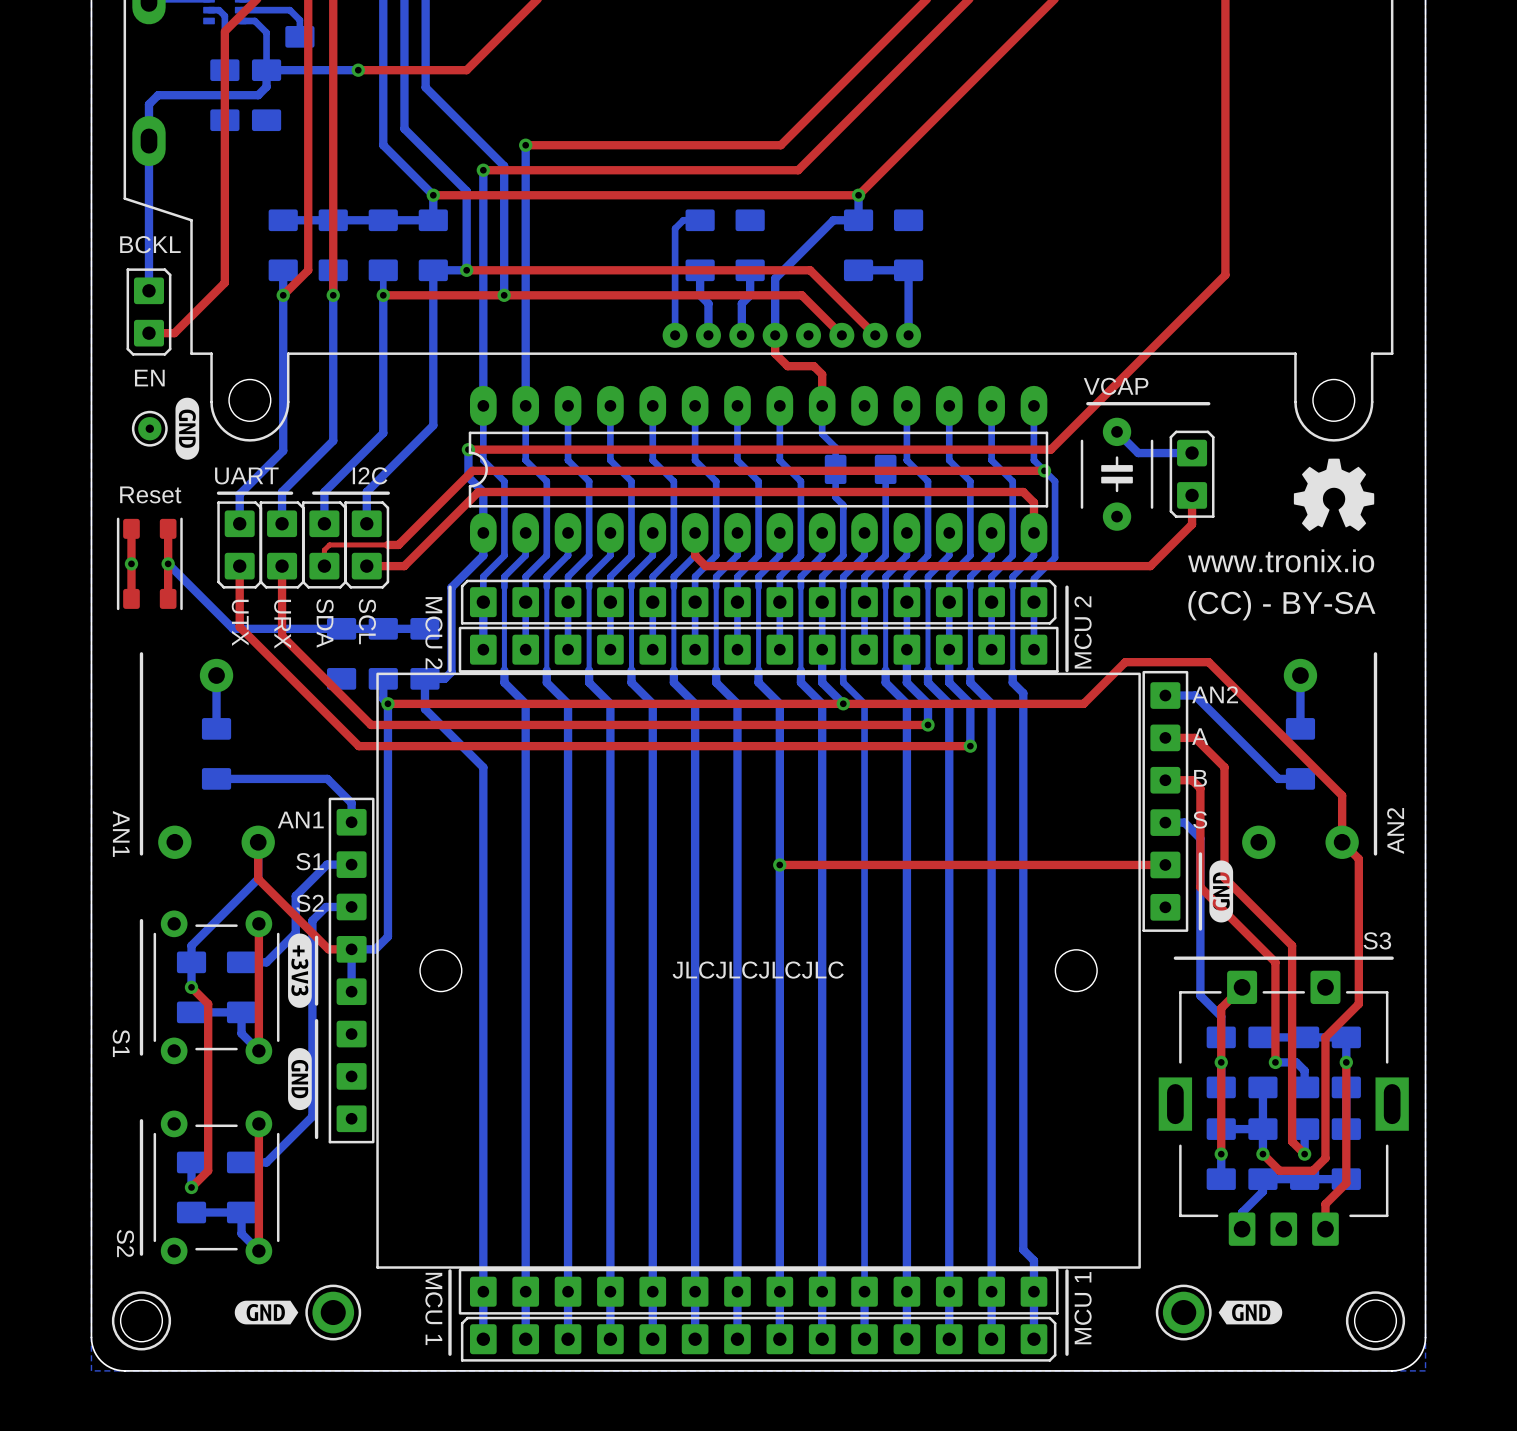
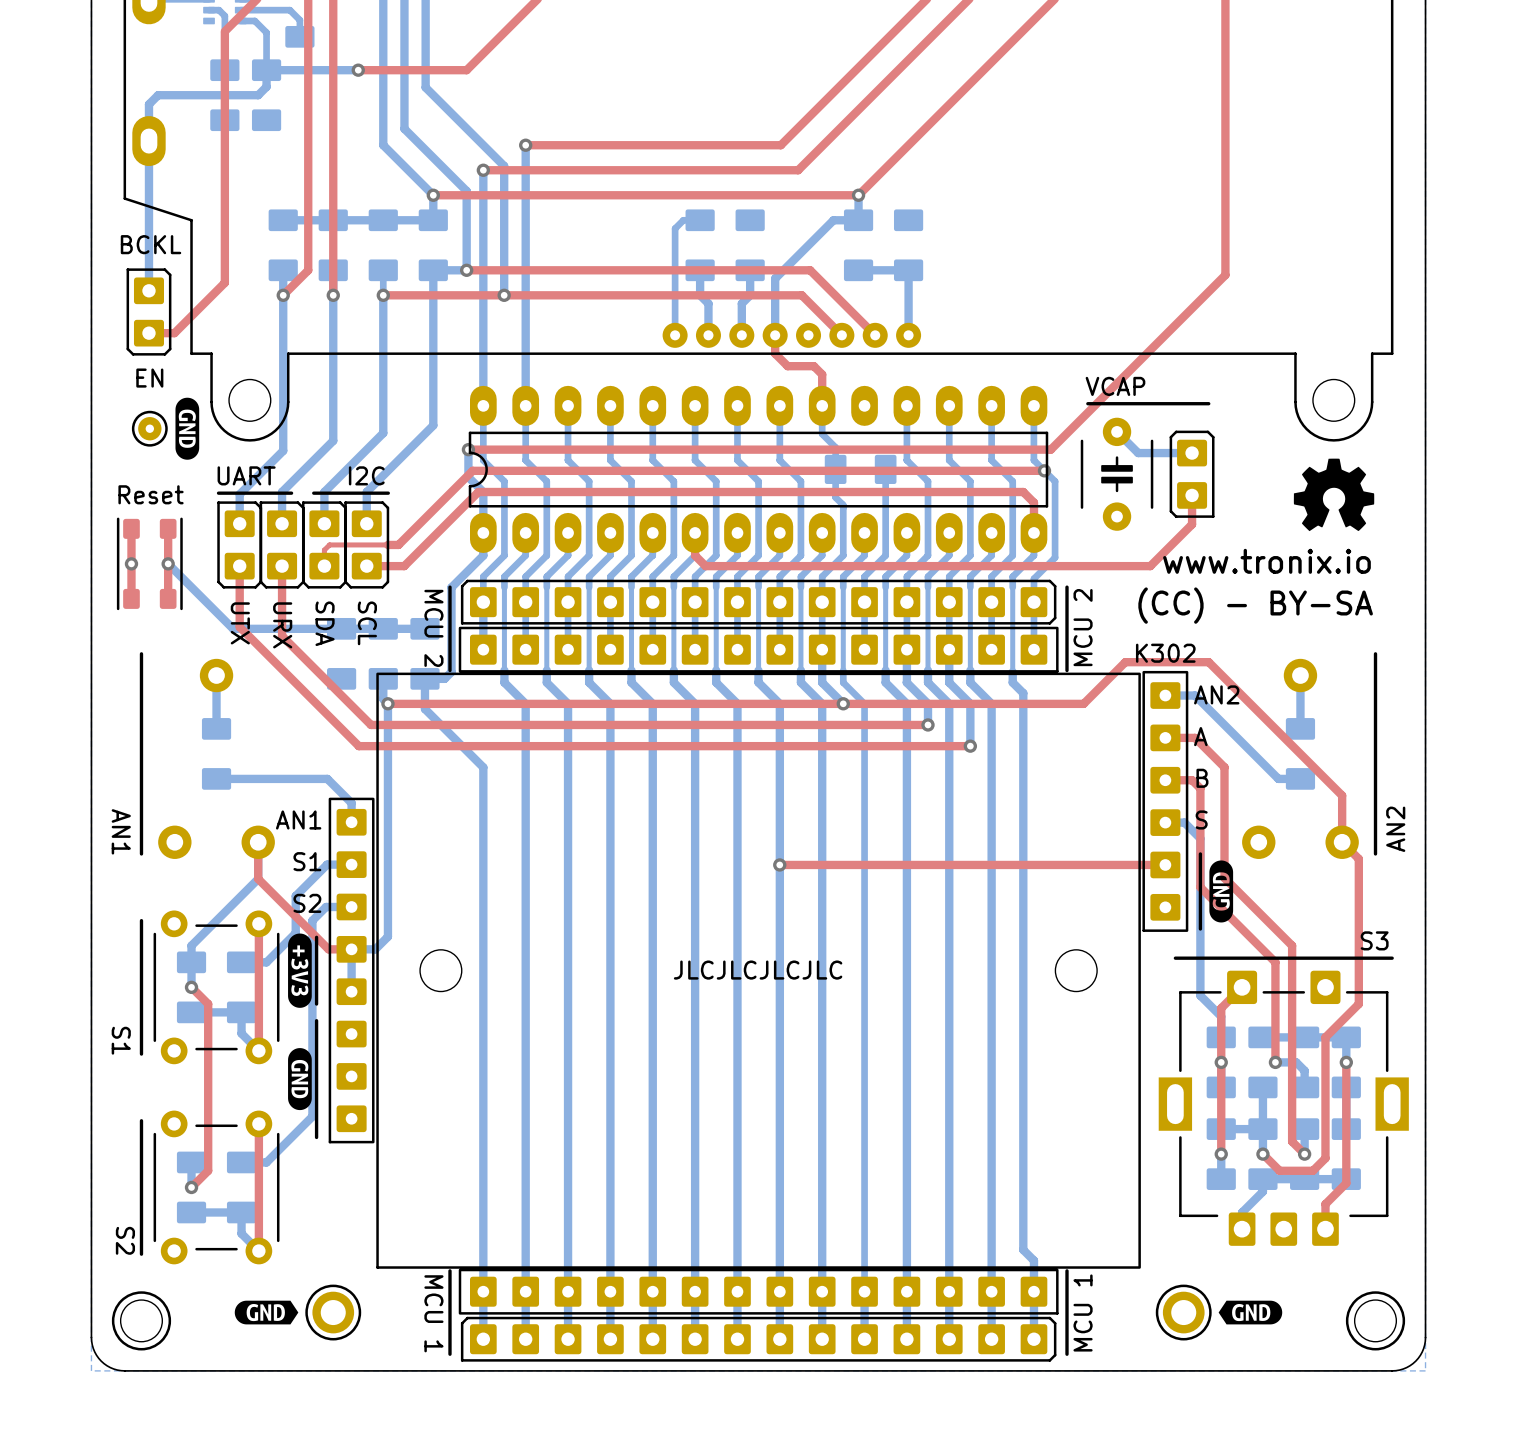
K302 name: none -> K302 (1165, 653)
part footprint: [1158, 970, 1409, 1246] -> [1158, 970, 1409, 1246]

